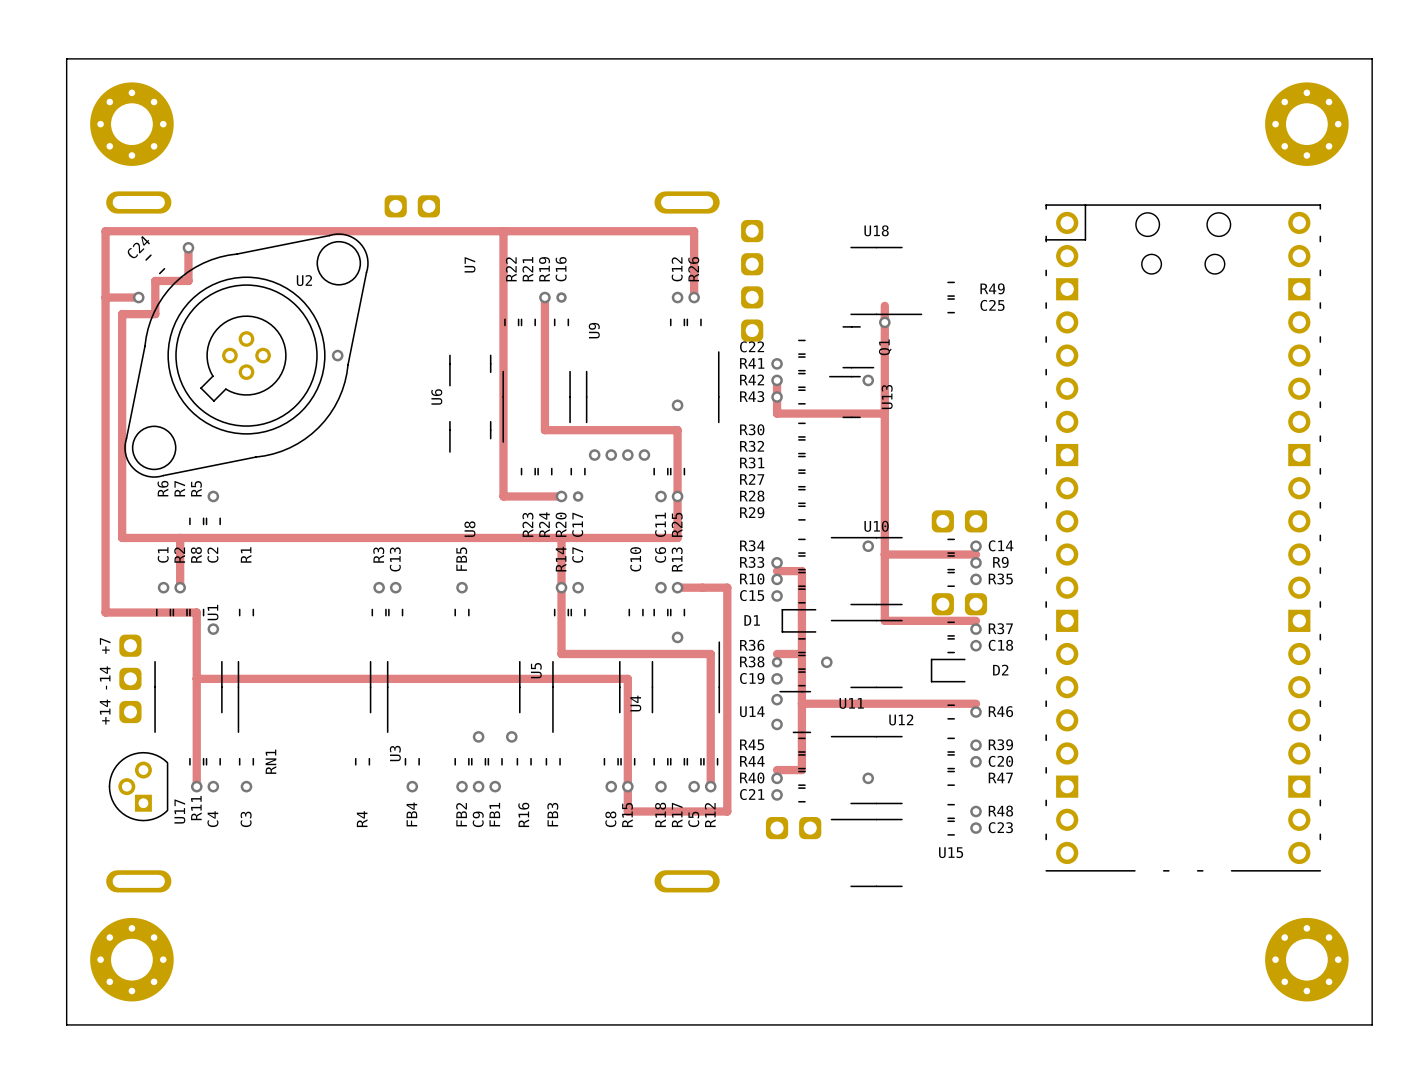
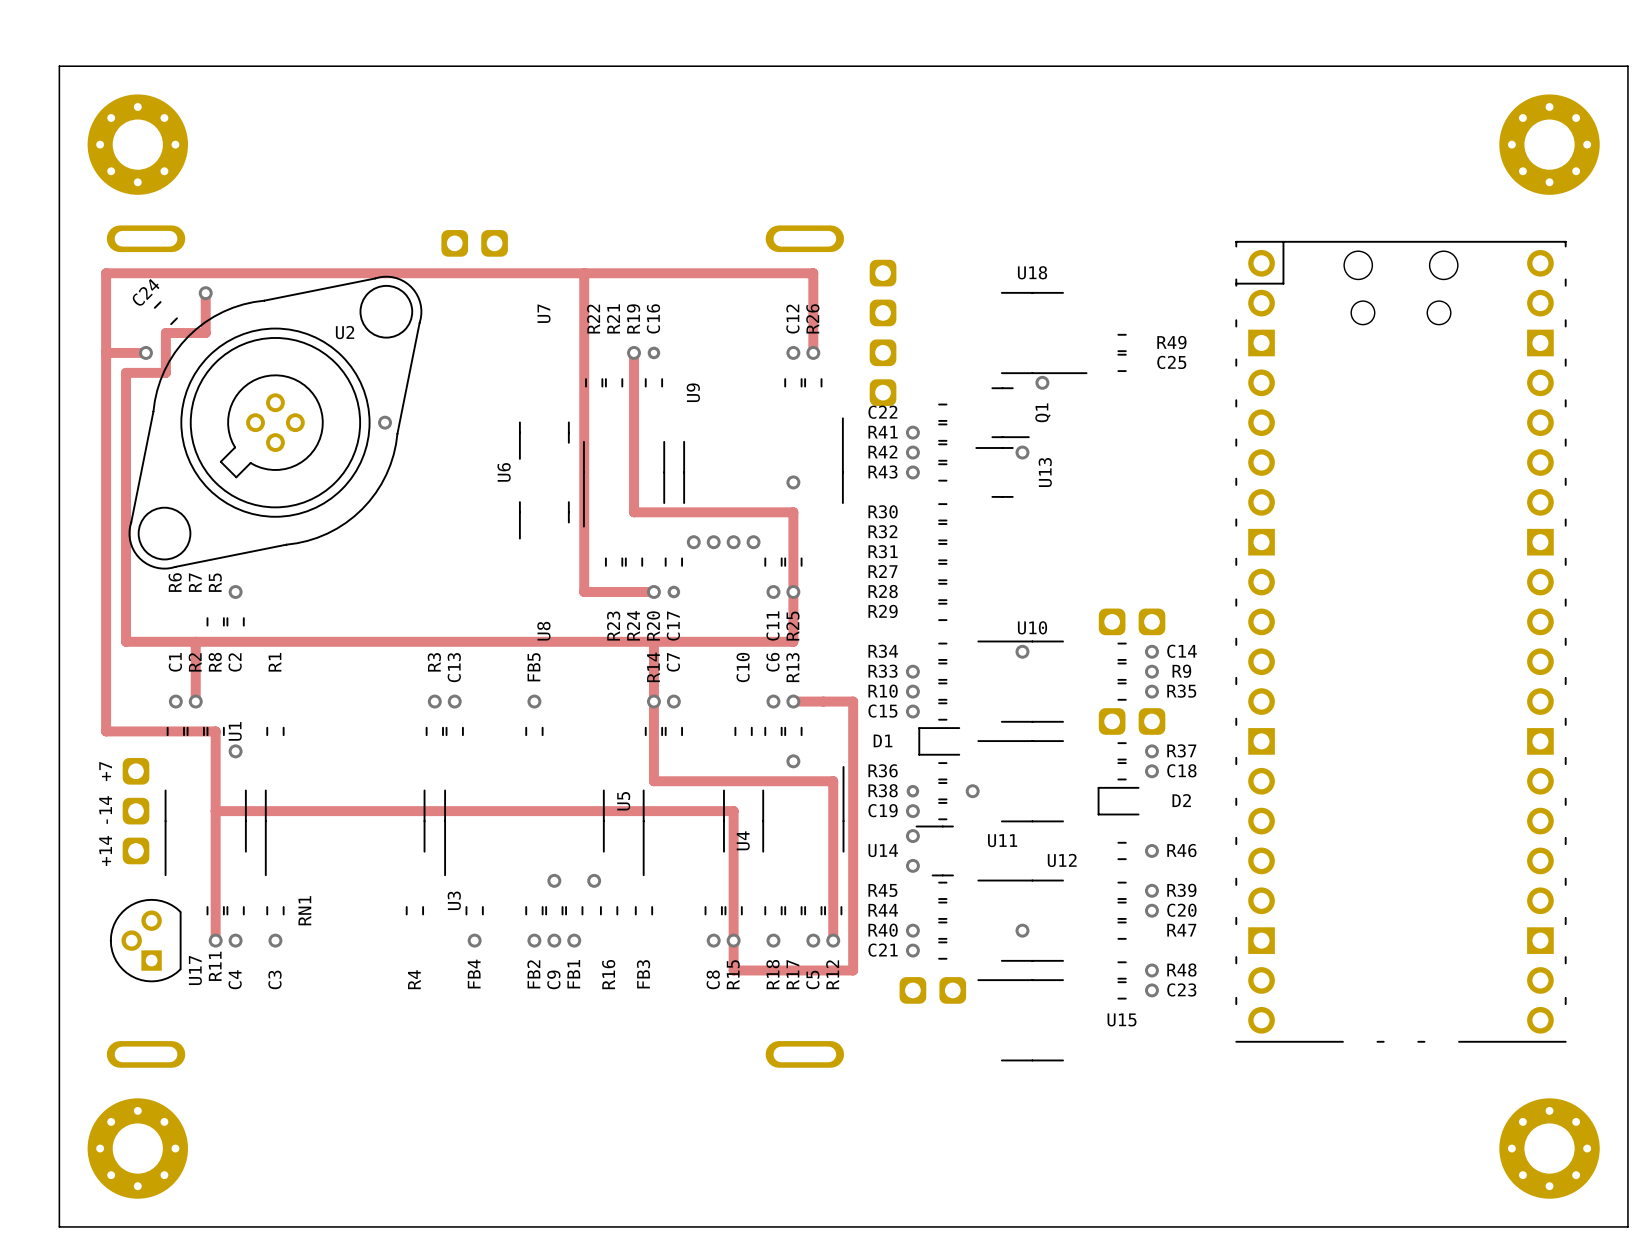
track: (884, 305) (884, 620) (976, 620) -> none
track: (777, 380) (777, 413) (884, 413) -> none
track: (884, 554) (976, 554) -> none
track: (777, 571) (801, 571) (801, 770) (777, 770) -> none
track: (777, 654) (801, 654) -> none
track: (801, 703) (976, 703) -> none

